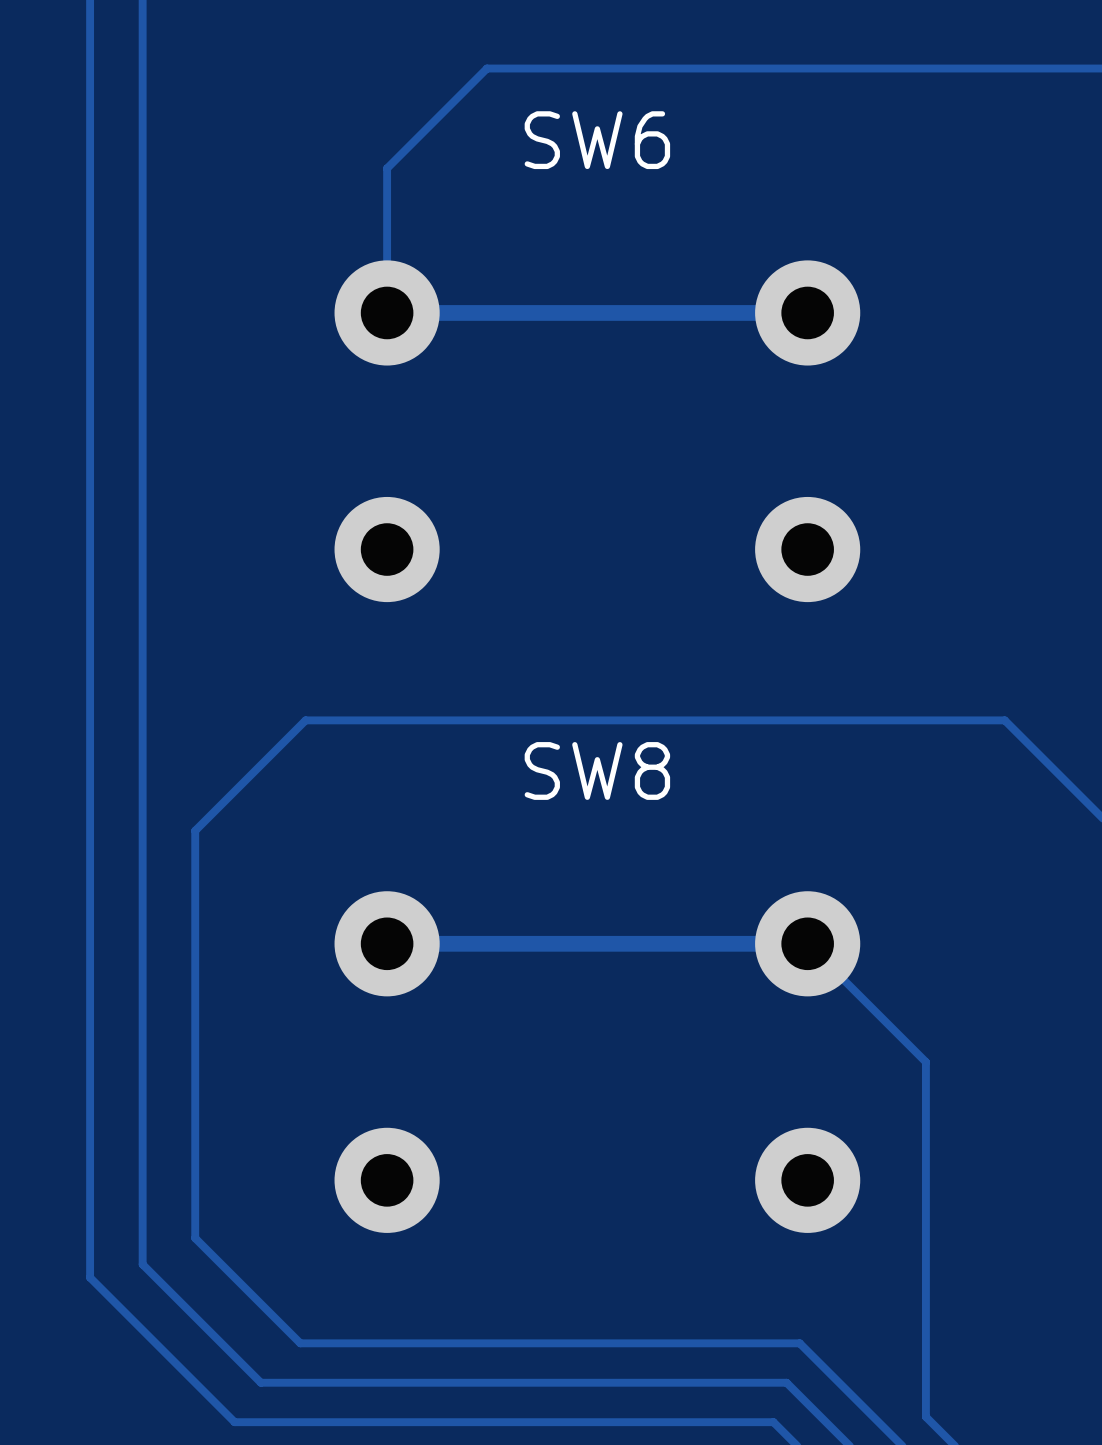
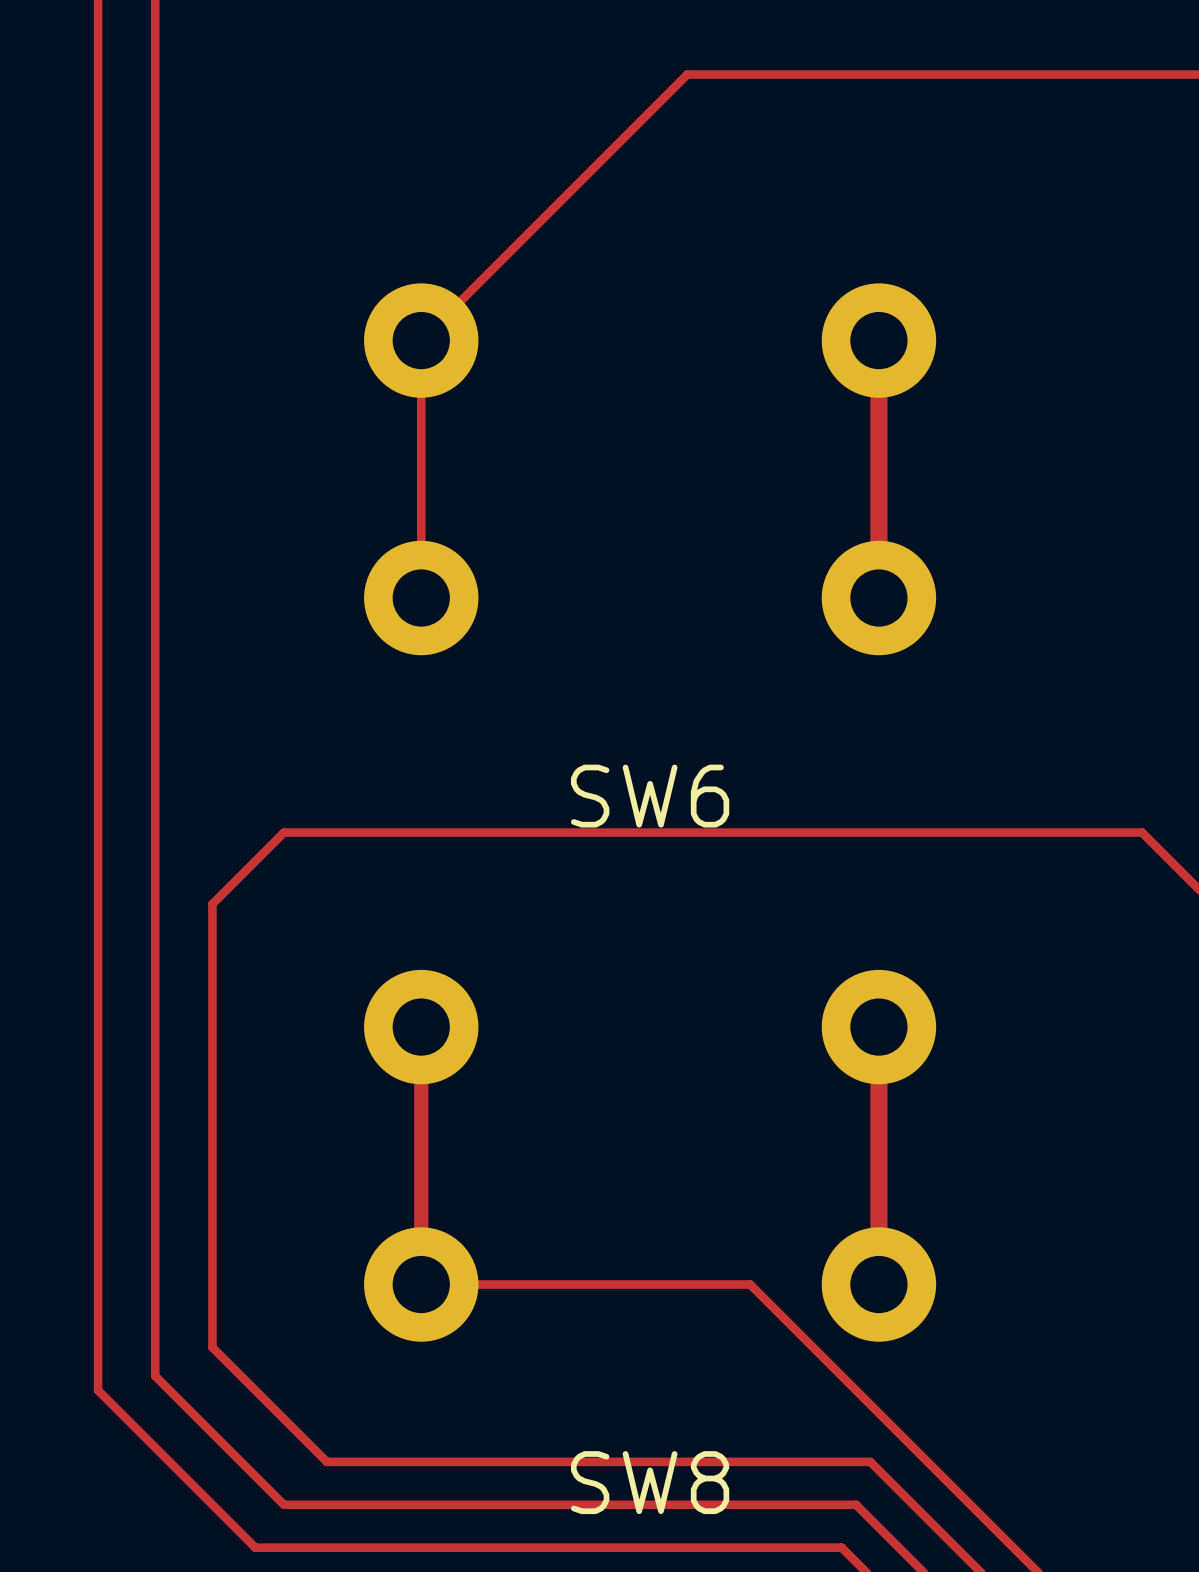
track: (631, 68) (486, 68) (387, 168) (387, 312) (807, 312) -> (687, 74) (421, 340) (421, 598)
SW6 name position: SW6 (597, 140) -> SW6 (650, 796)
track: none -> (878, 340) (878, 598)
track: (260, 765) (305, 720) (1004, 720) (1049, 765) -> (283, 832) (1142, 832)
SW8 name position: SW8 (597, 770) -> SW8 (650, 1482)
track: (387, 943) (807, 943) (925, 1062) (925, 1416) -> (421, 1027) (421, 1284) (750, 1284) (1007, 1541)
track: none -> (878, 1027) (878, 1284)

